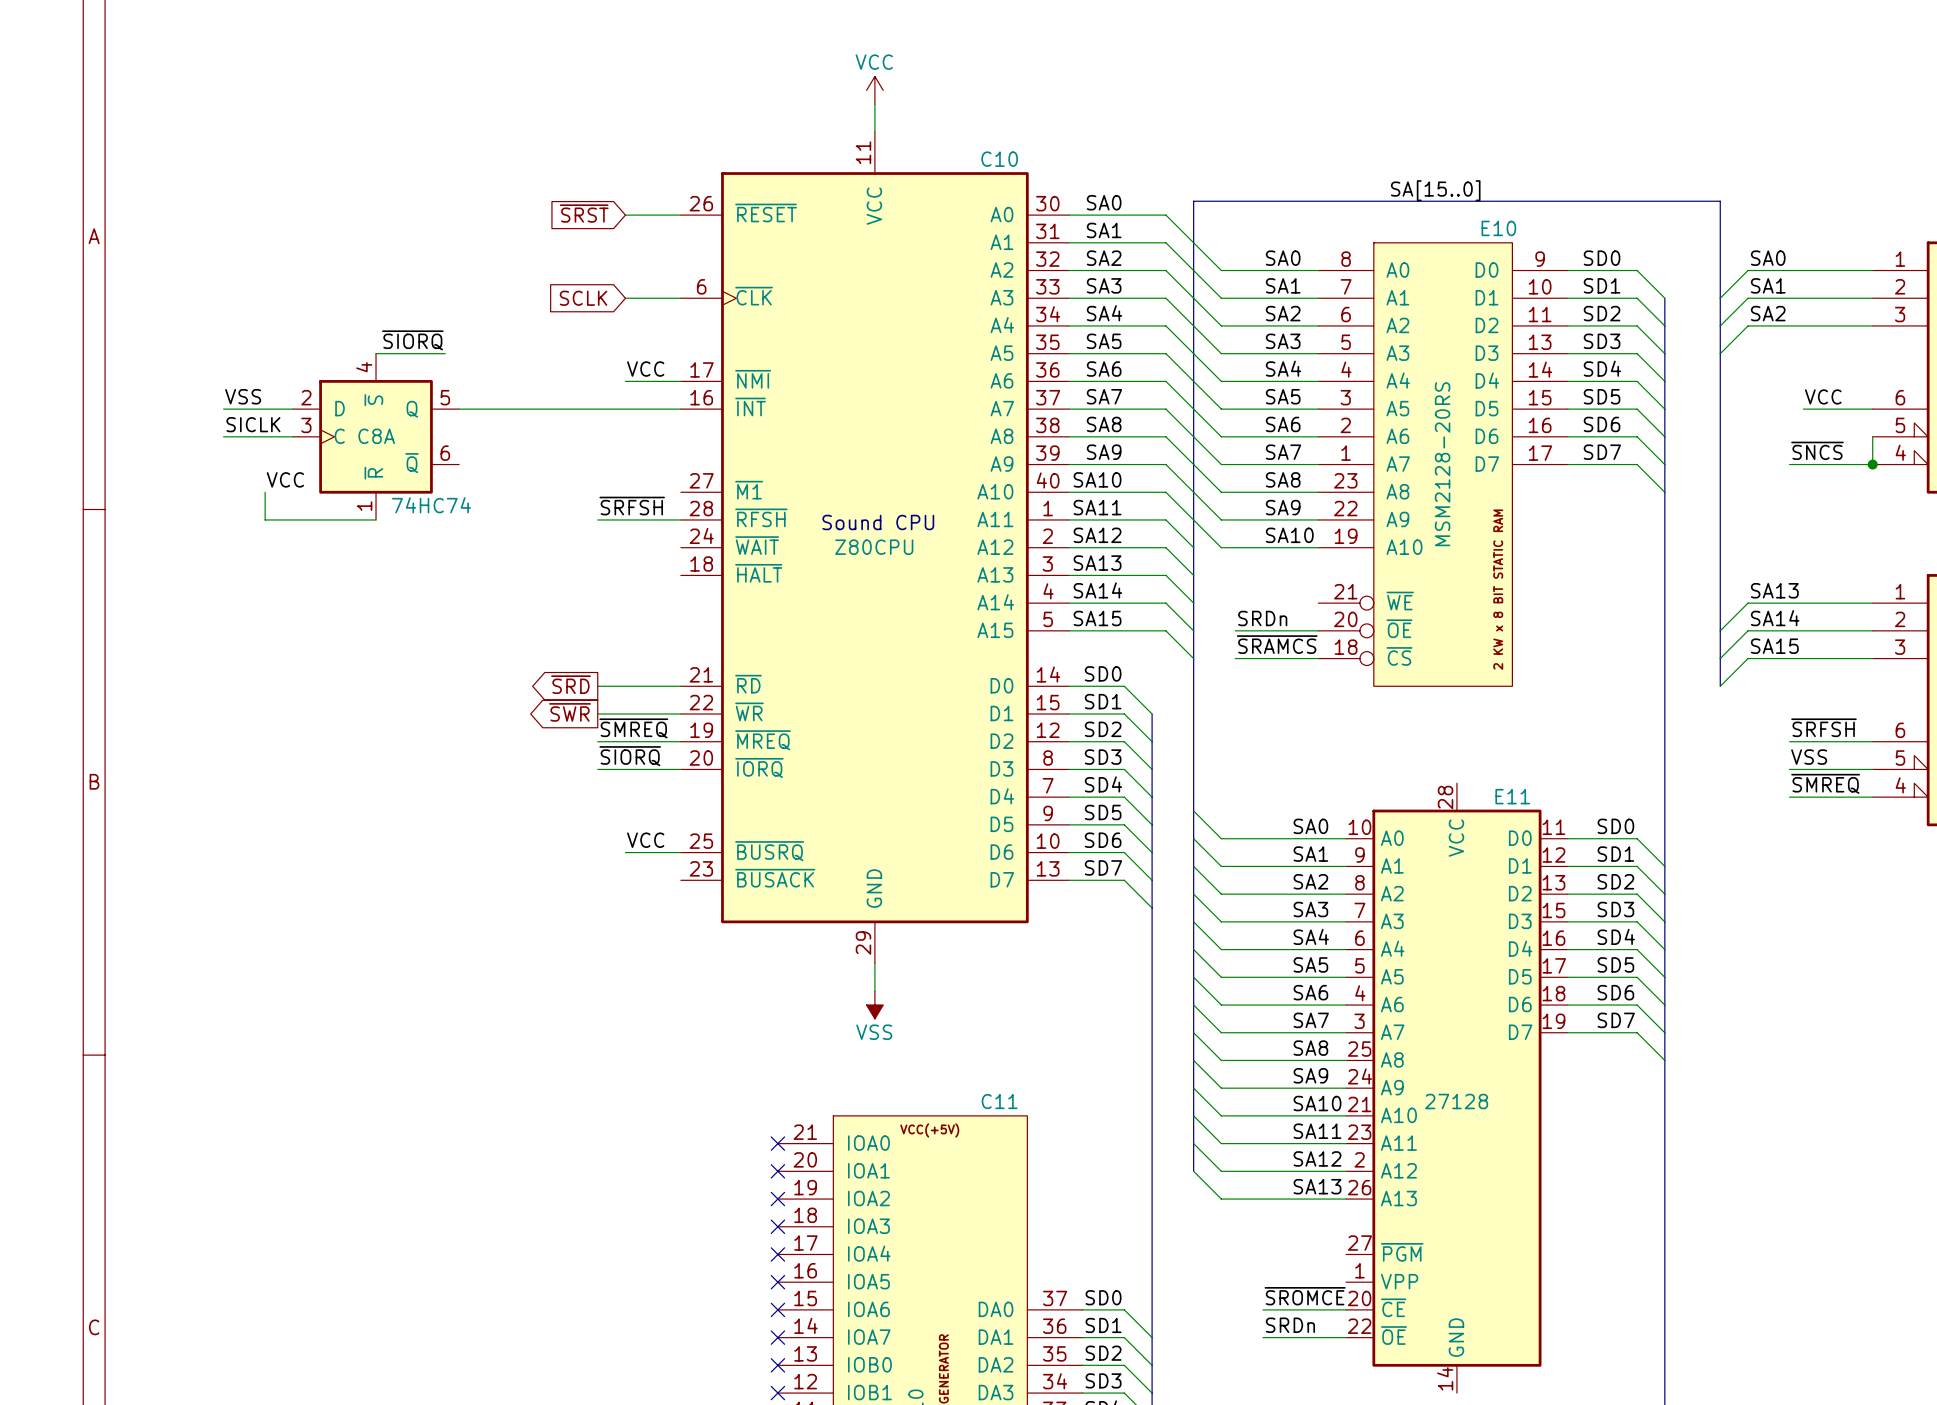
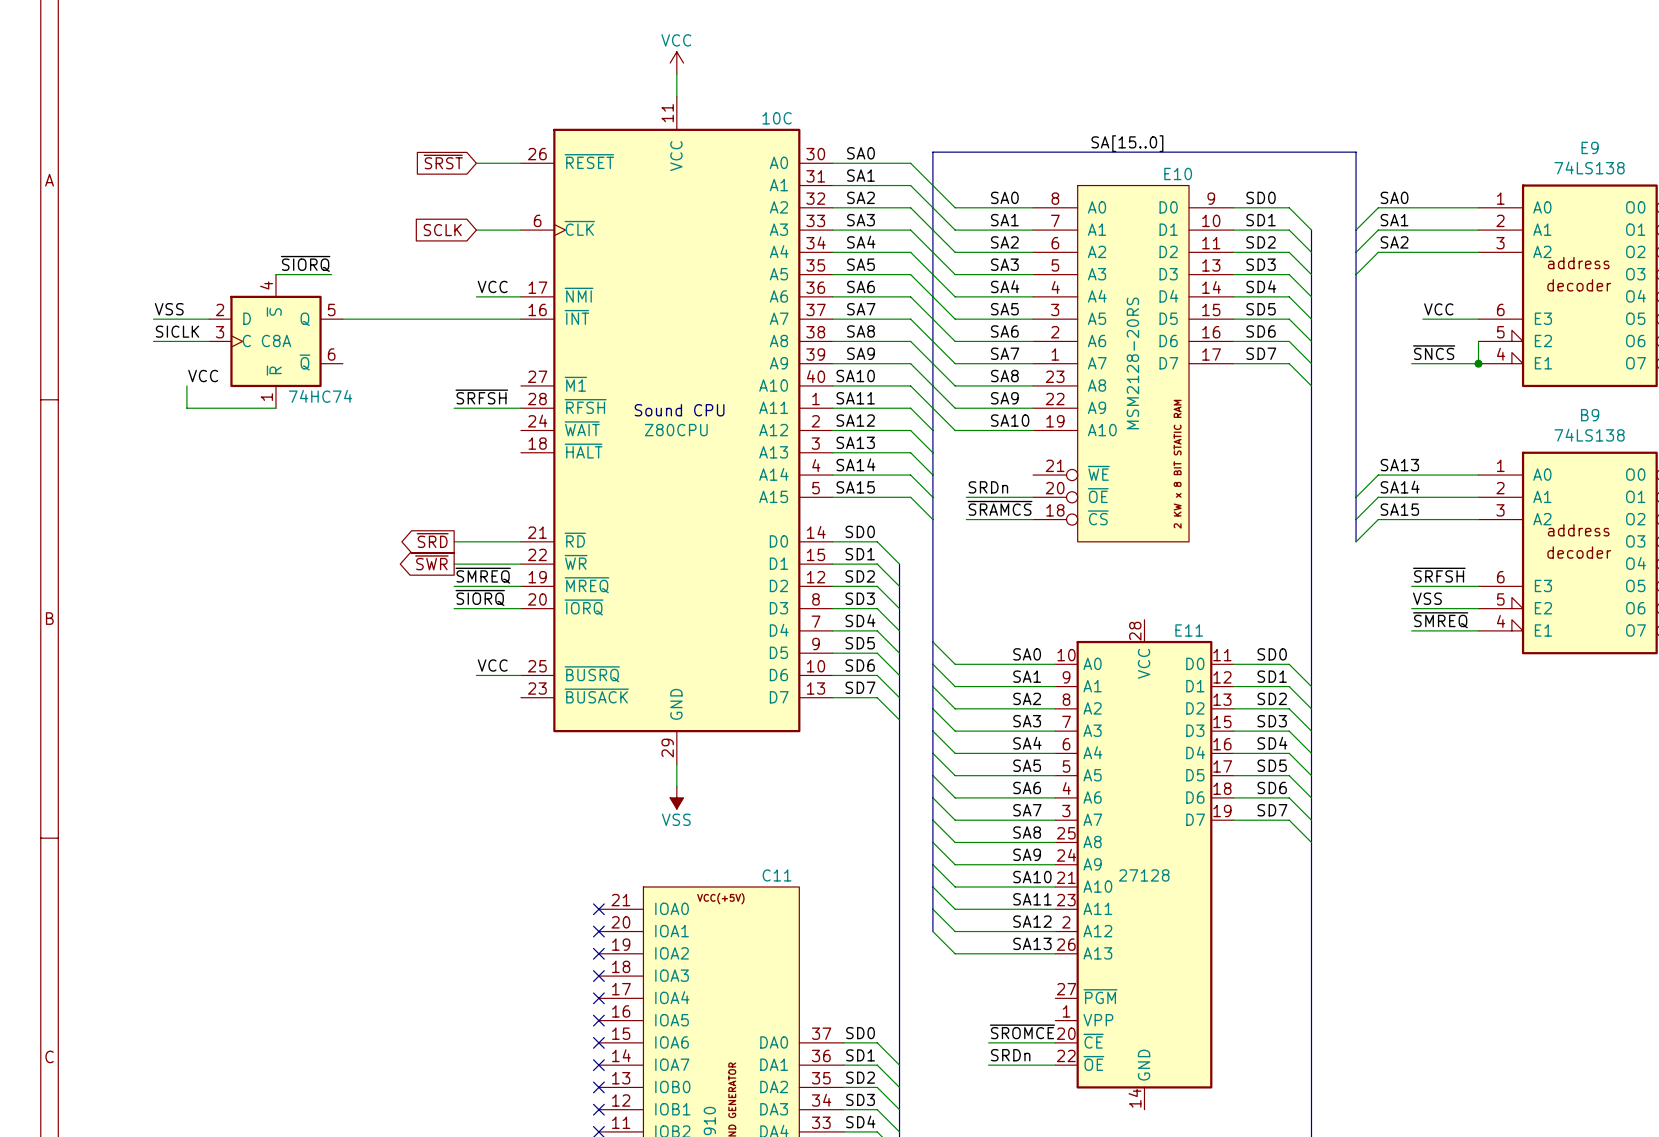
C10 name: C10 (999, 159) -> 10C (777, 118)

